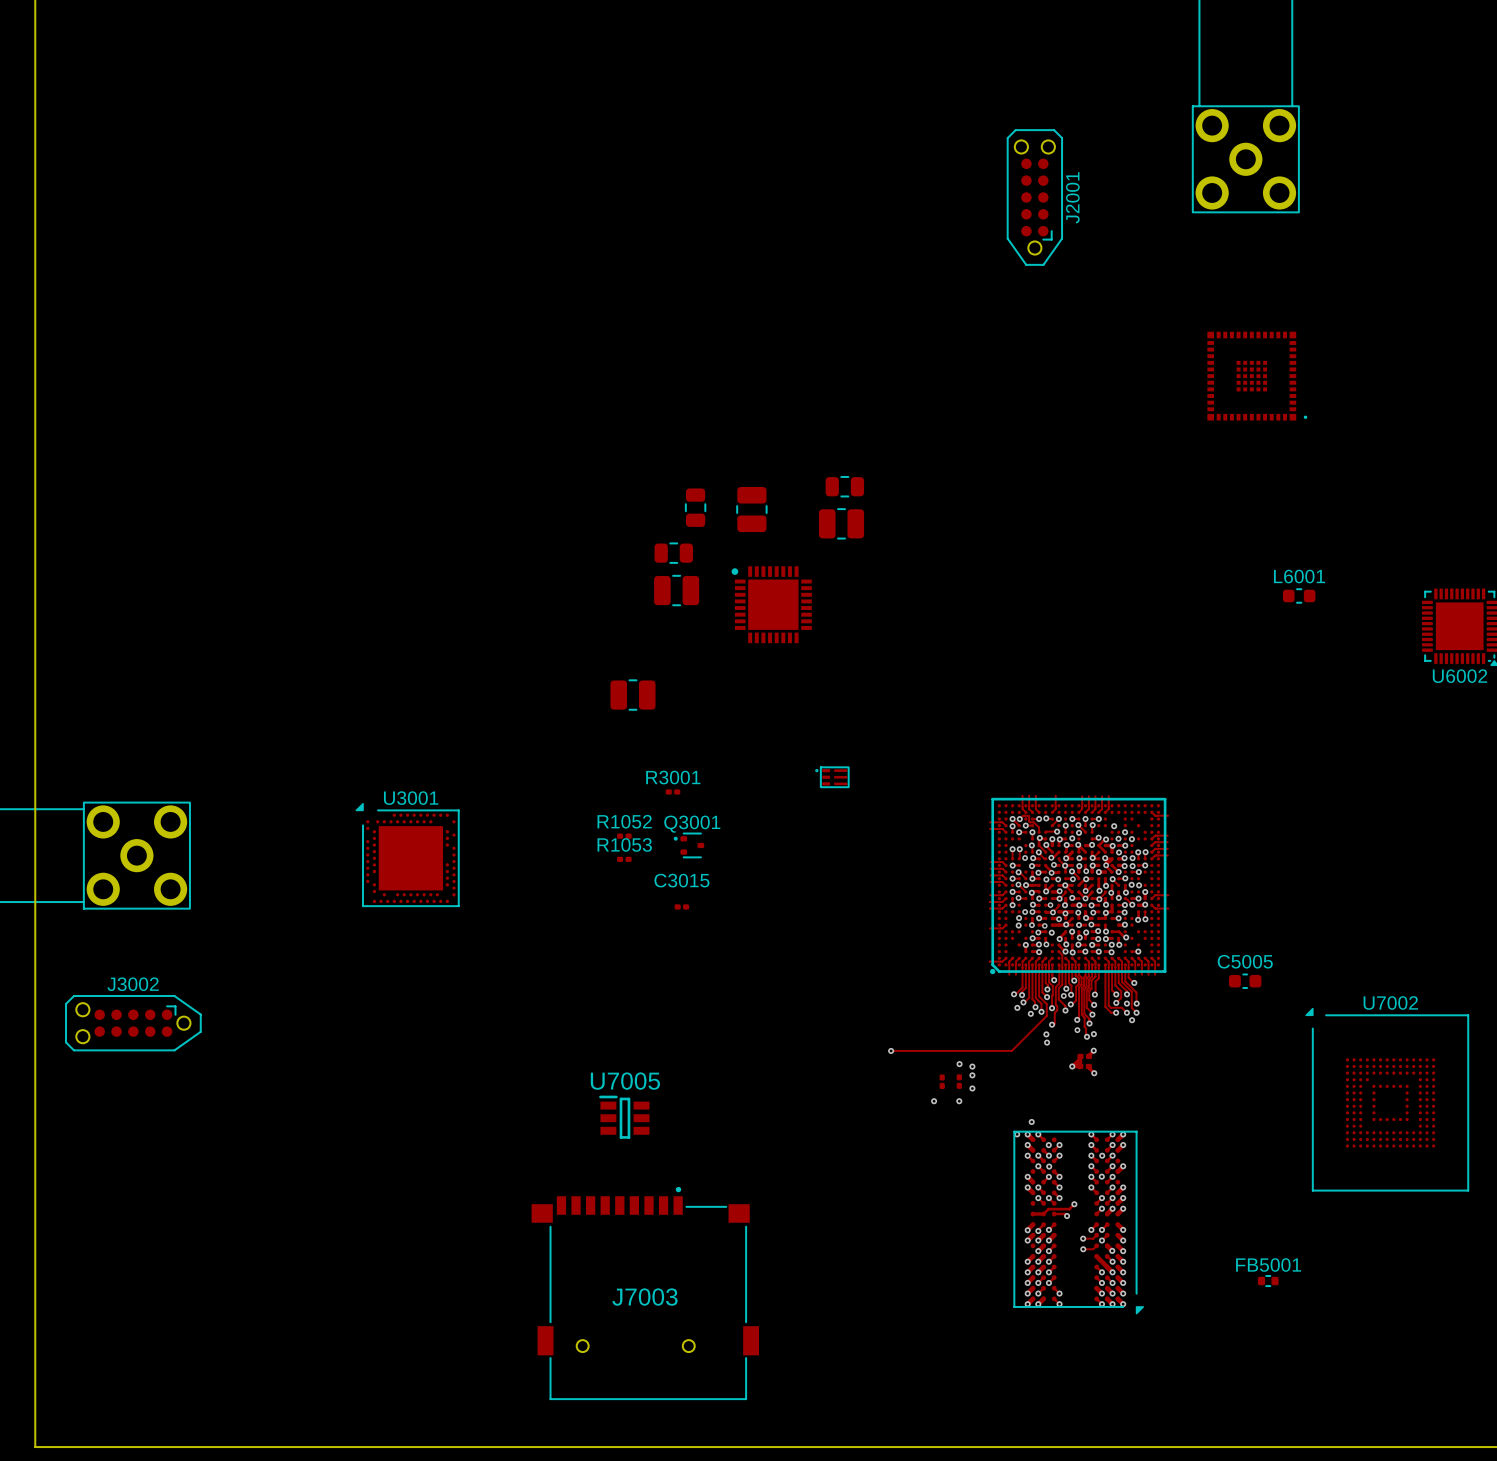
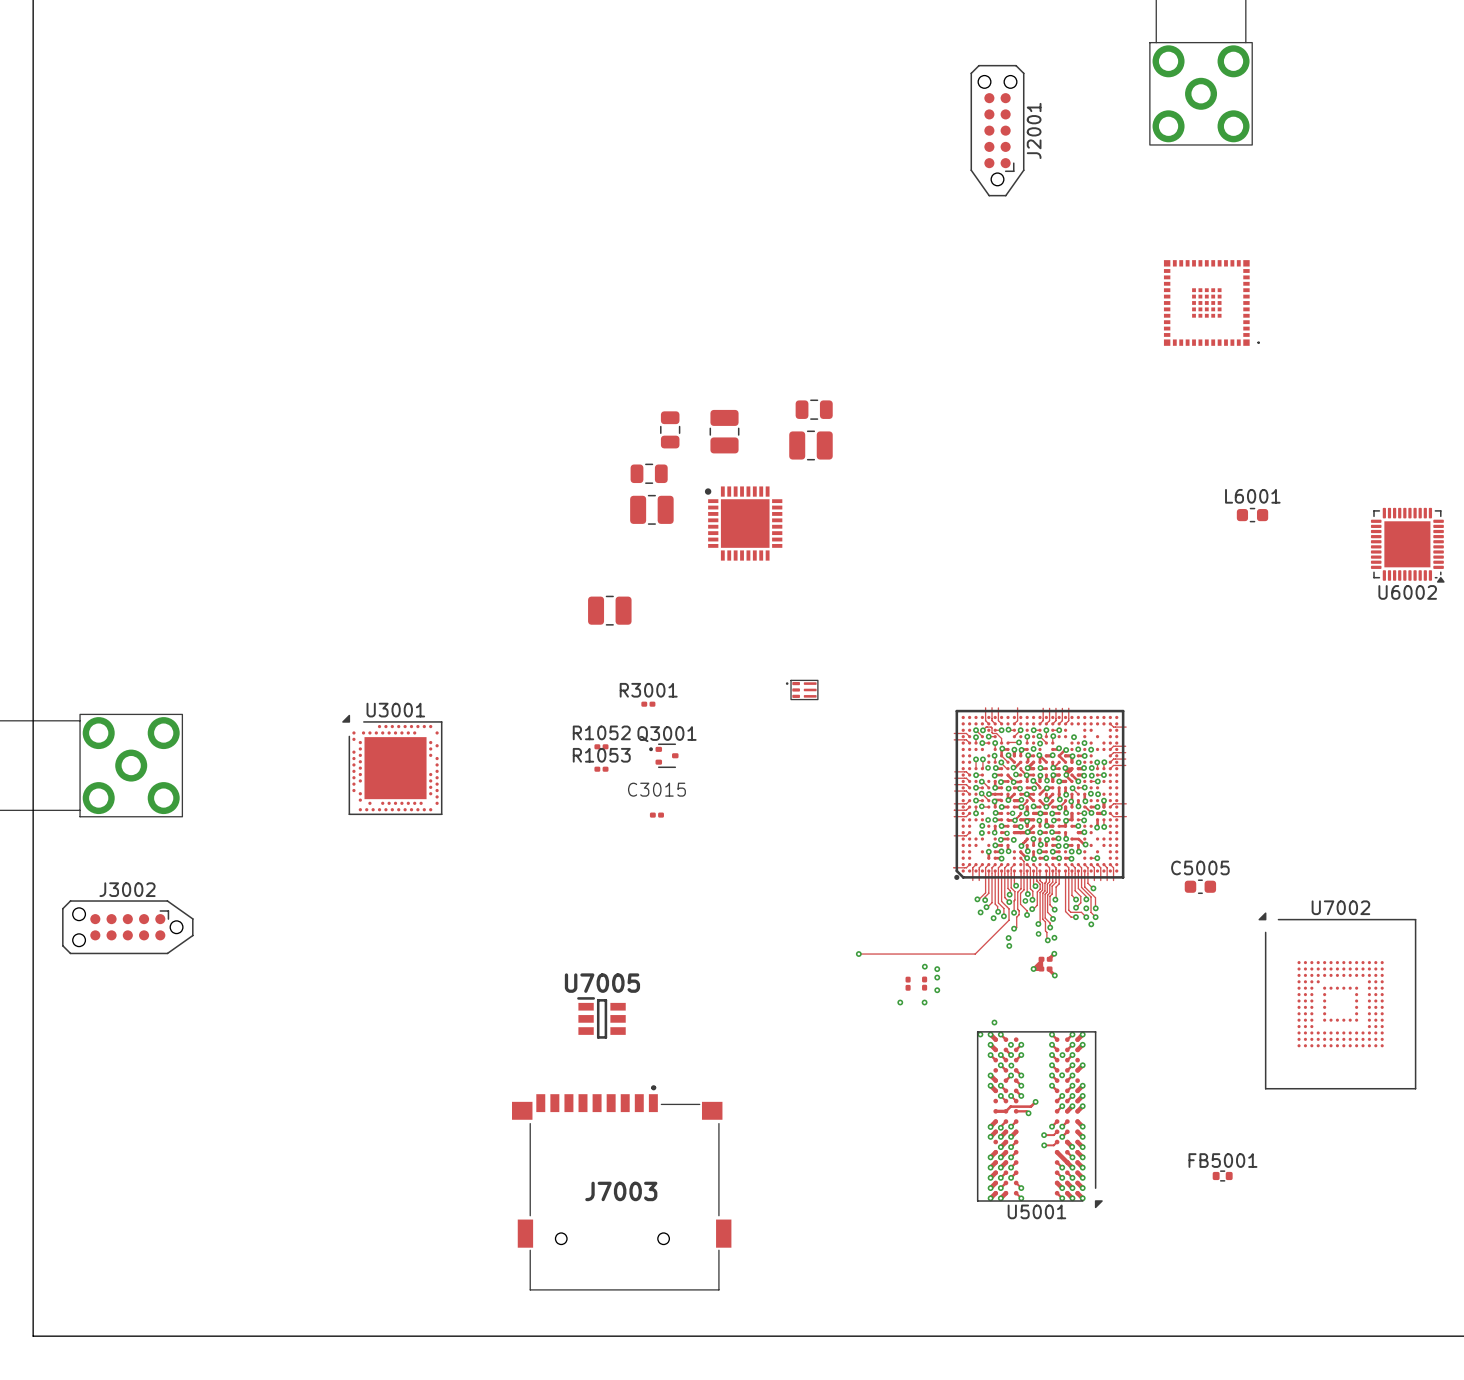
U5001 name: none -> U5001 (1036, 1211)

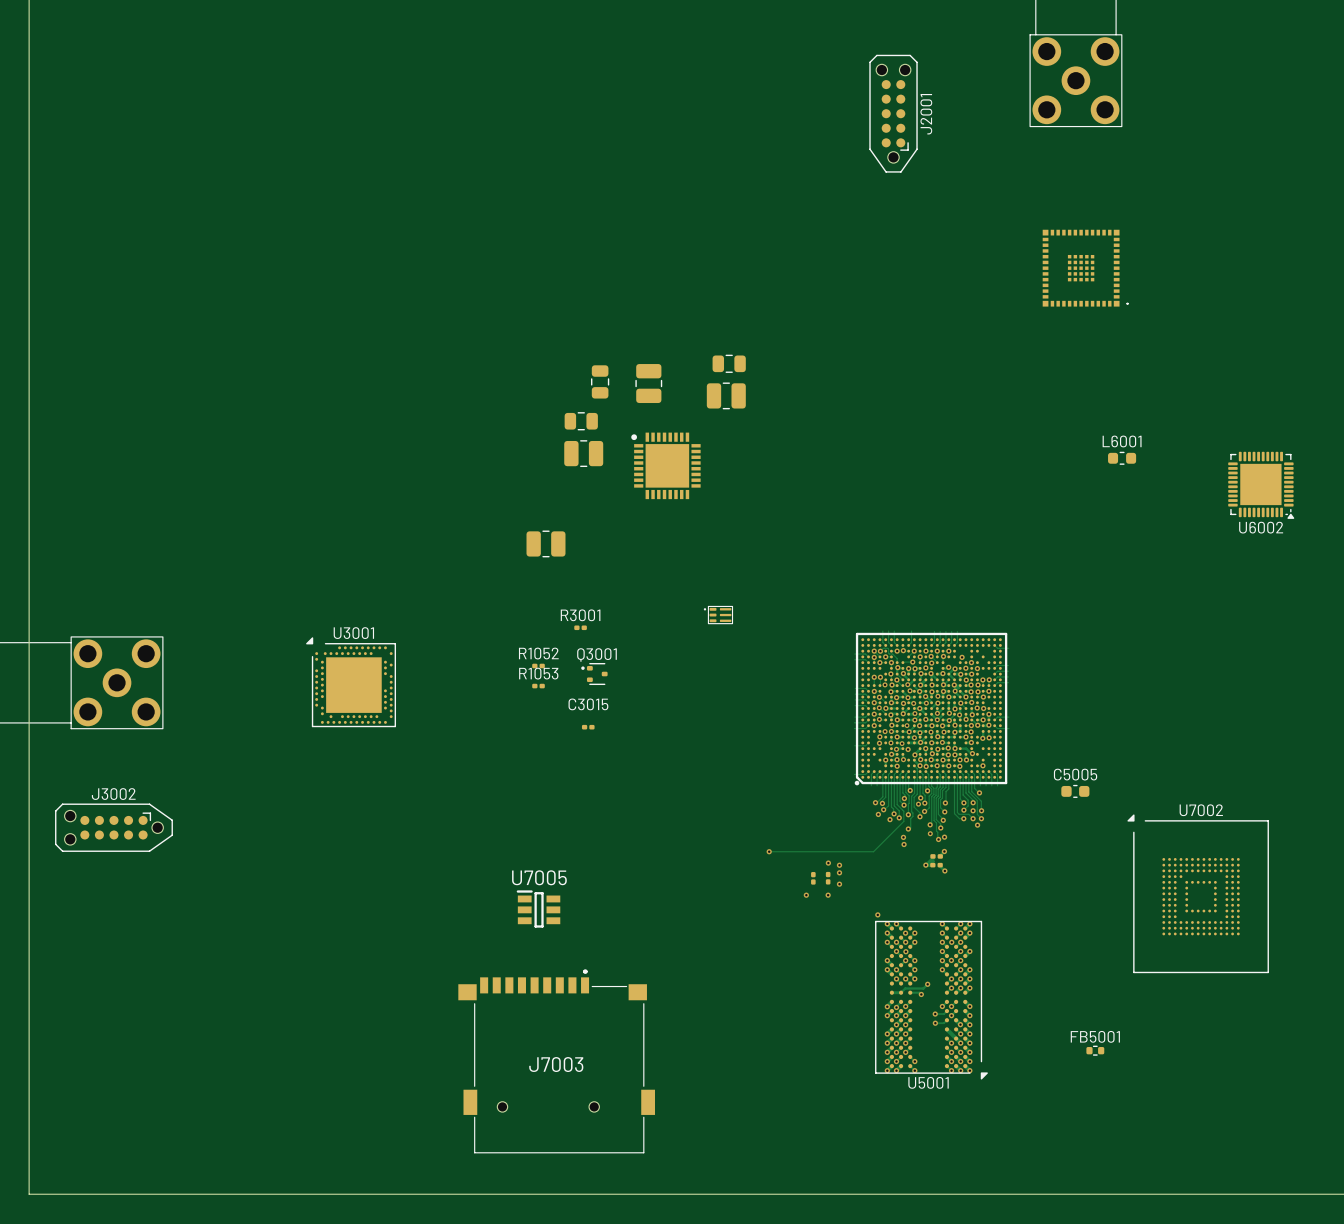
via: (994, 1022) -> none
via: none -> (877, 914)
via: (980, 1034) -> none

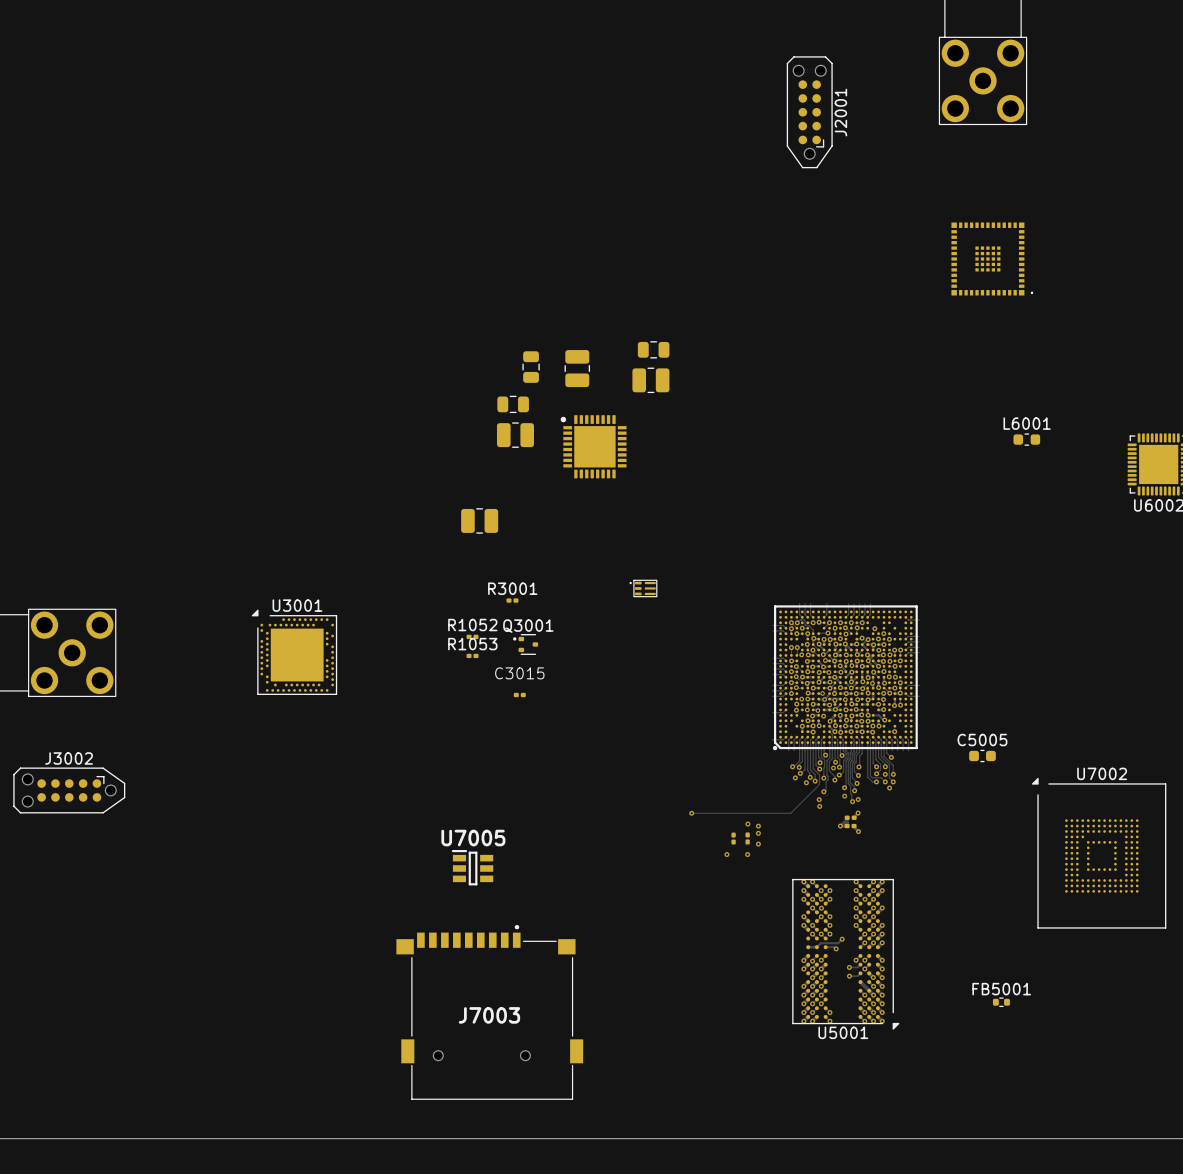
via: (877, 914) -> none

